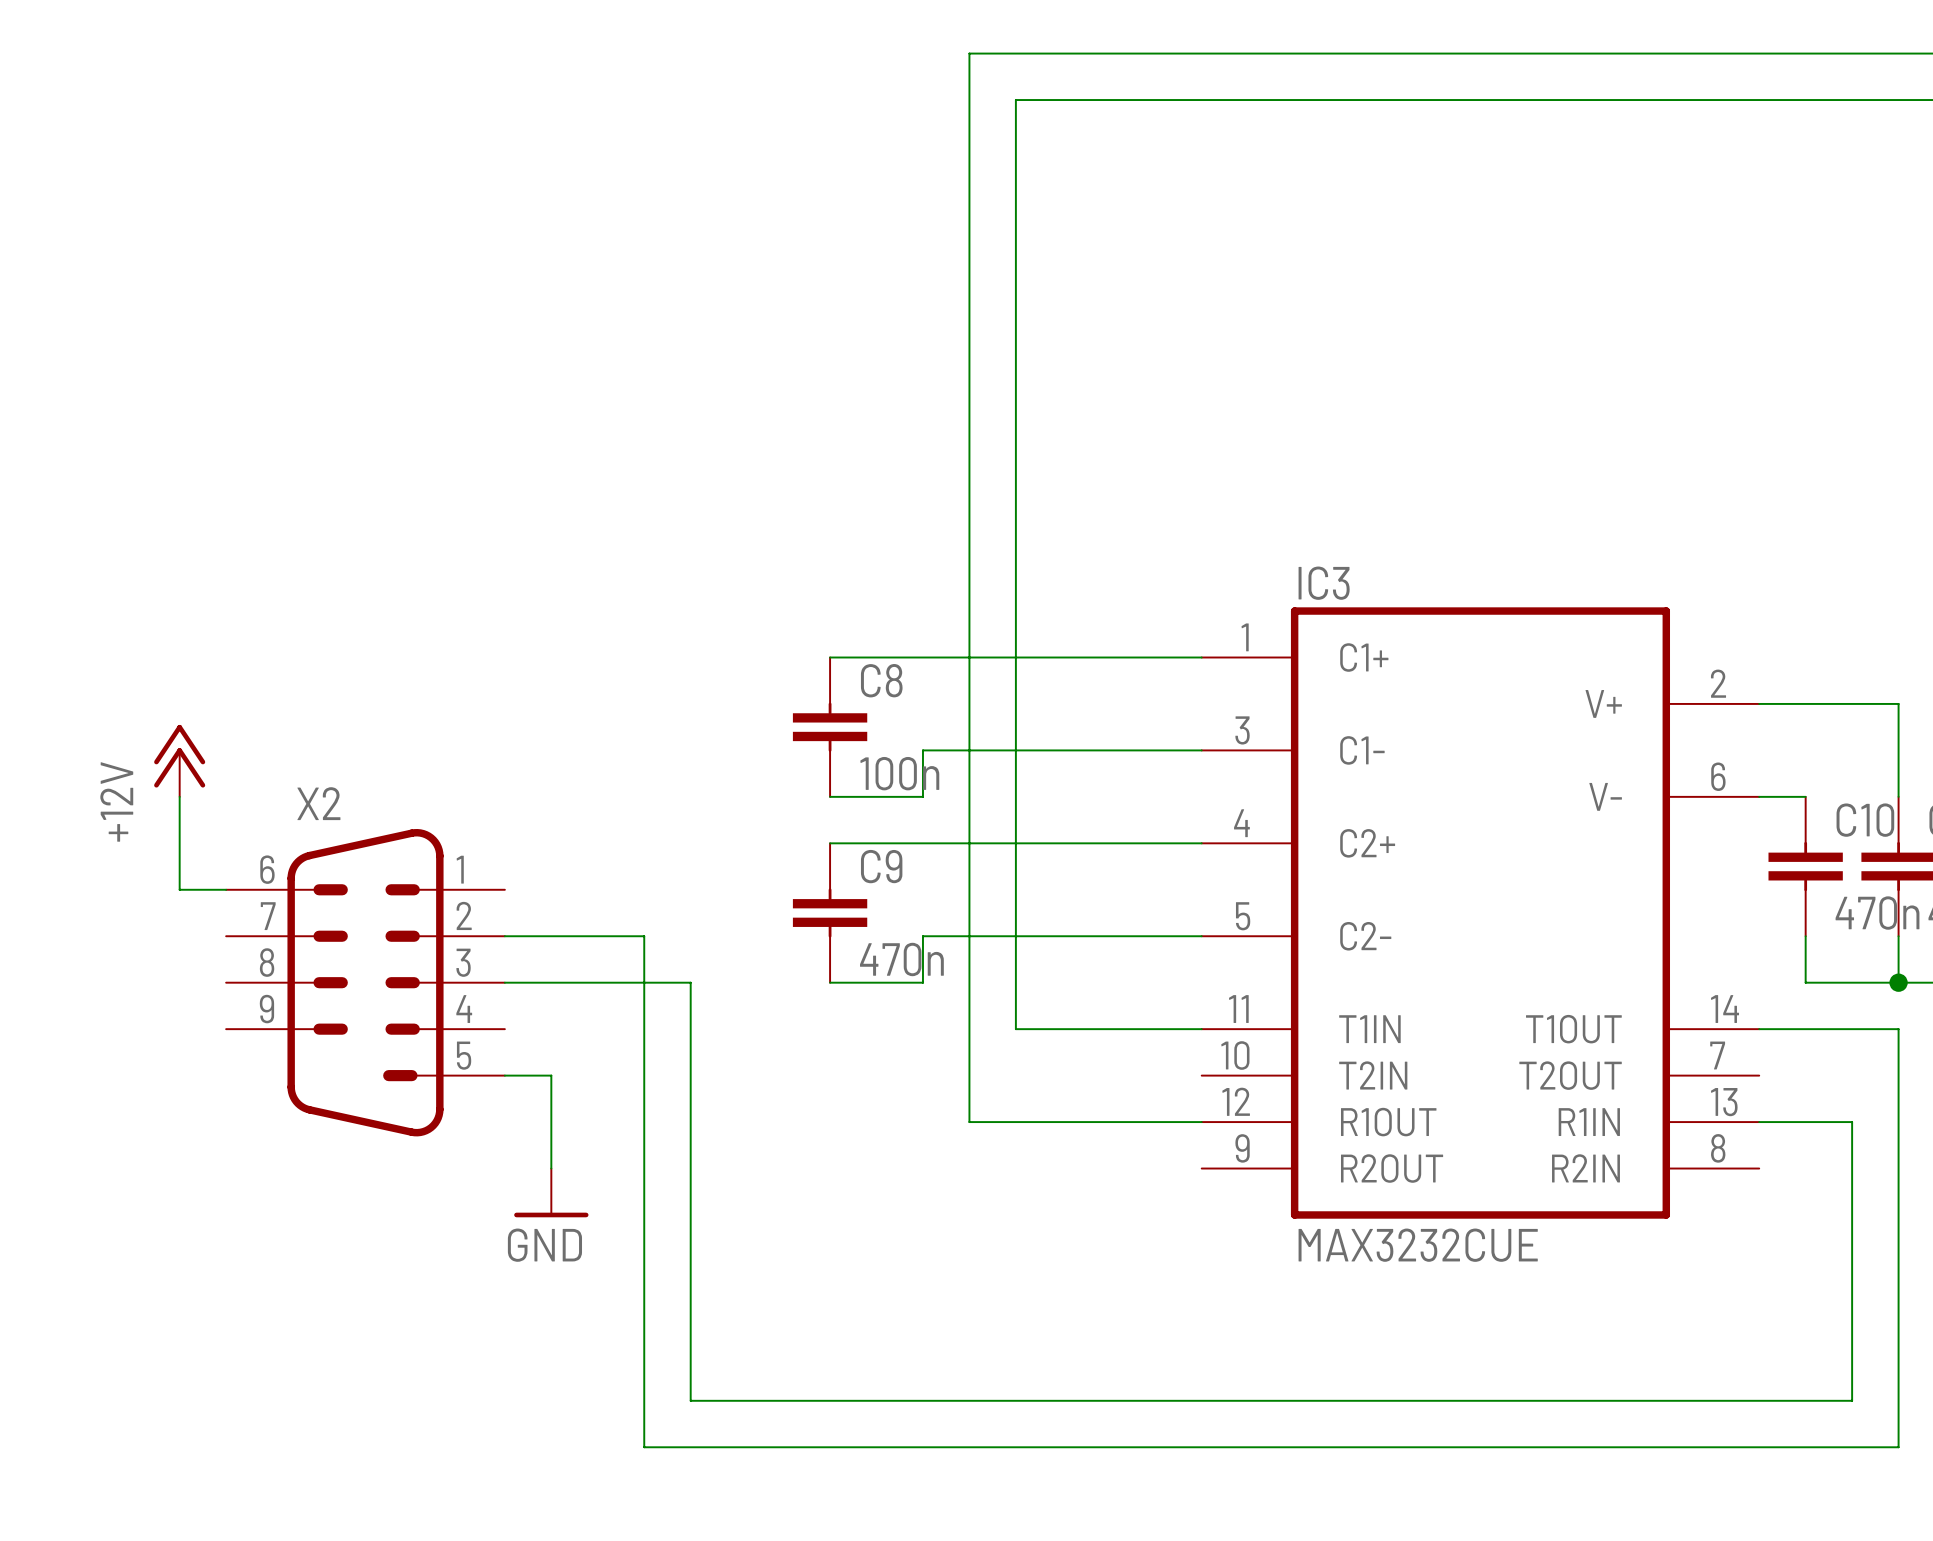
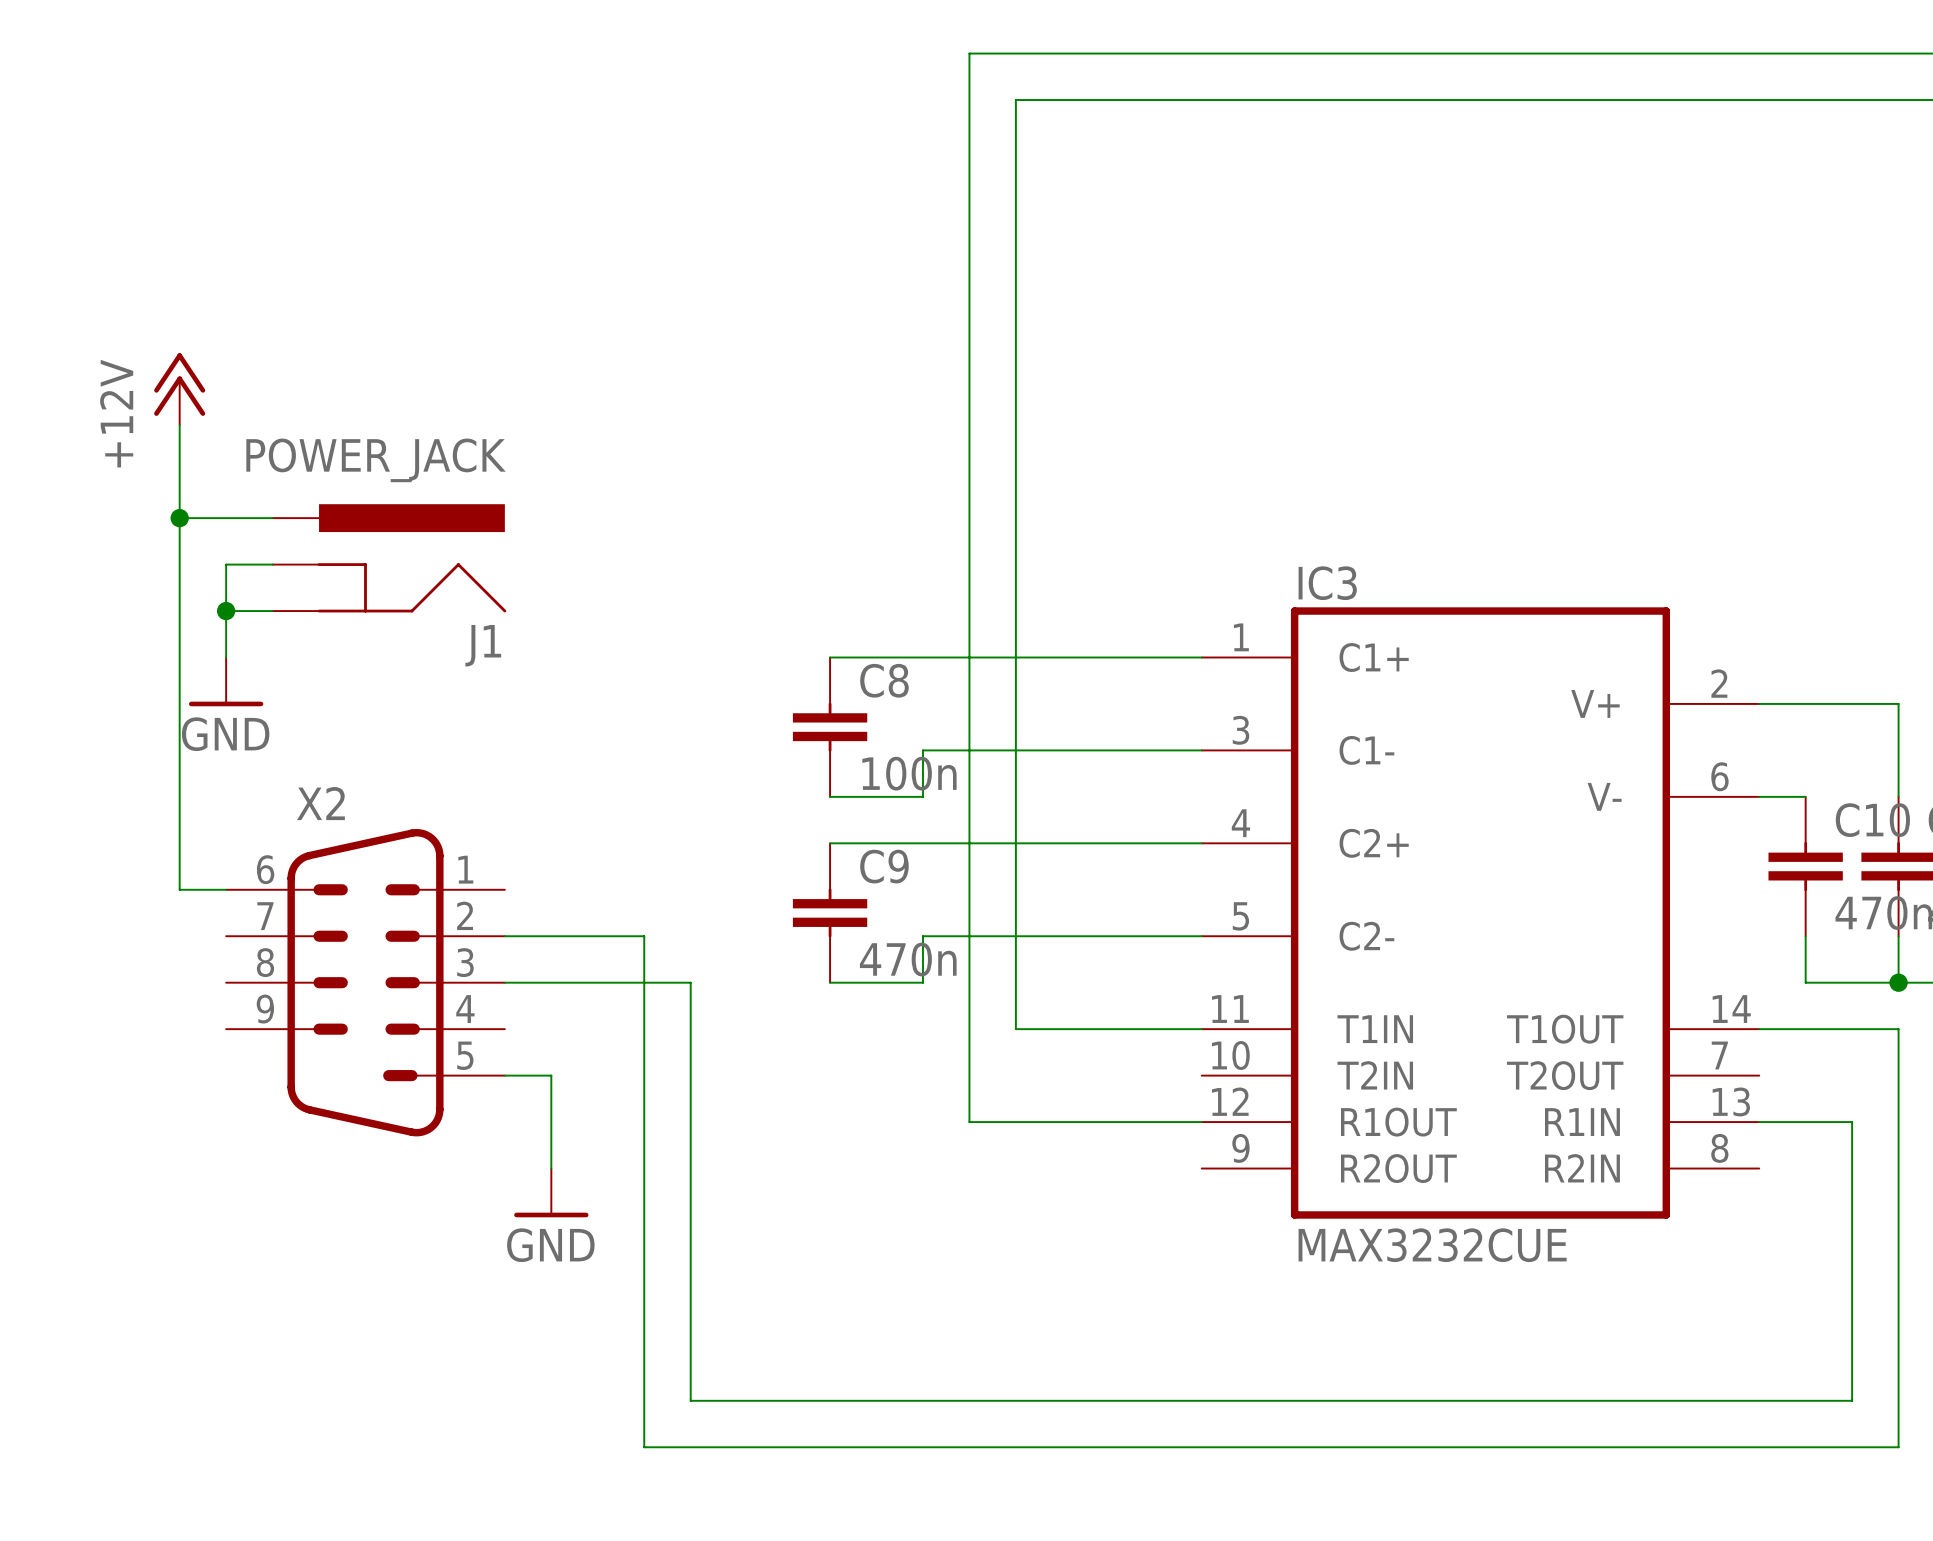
wire: none -> (179, 425) (179, 796)
wire: none -> (179, 518) (272, 518)
junction: none -> (179, 518)
J1: none -> POWER_JACK (389, 558)
wire: none -> (272, 564) (226, 564) (226, 657)
wire: none -> (226, 611) (272, 611)
junction: none -> (226, 611)
power symbol: none -> GND (226, 681)
power symbol position: +12V (179, 760) -> +12V (179, 389)

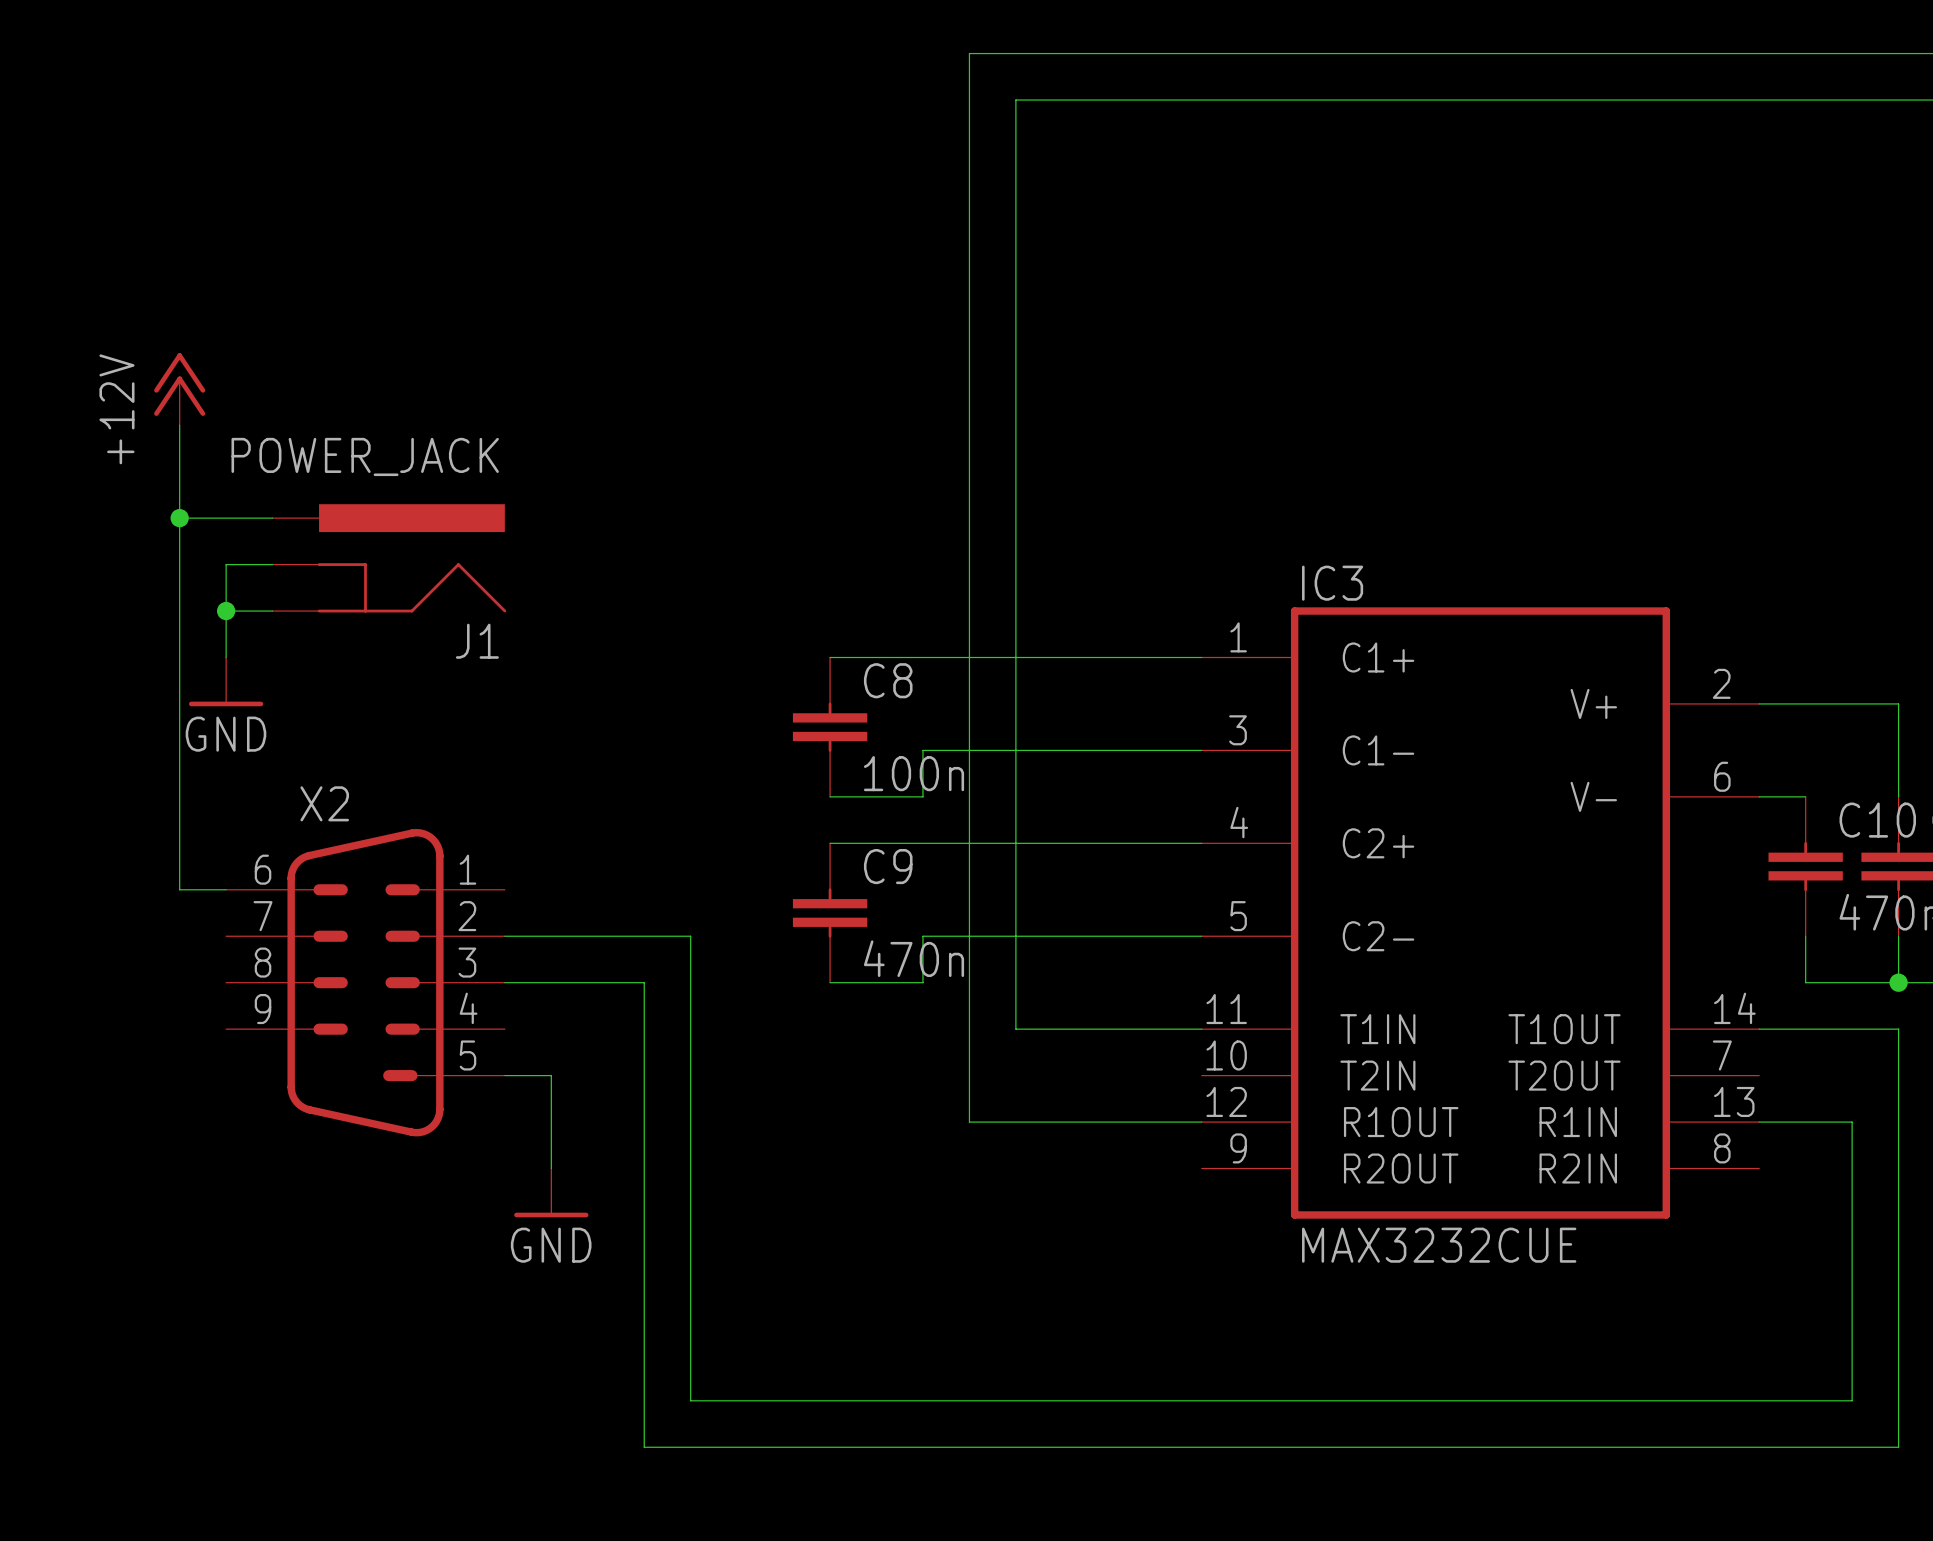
wire: (644, 936) (644, 982) (690, 982) -> (644, 936) (690, 936) (690, 982)

